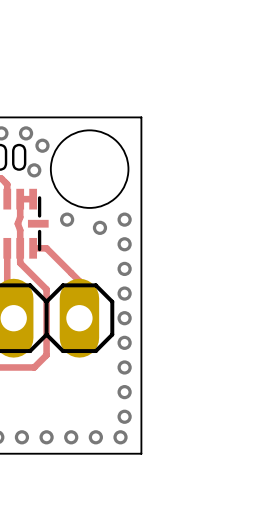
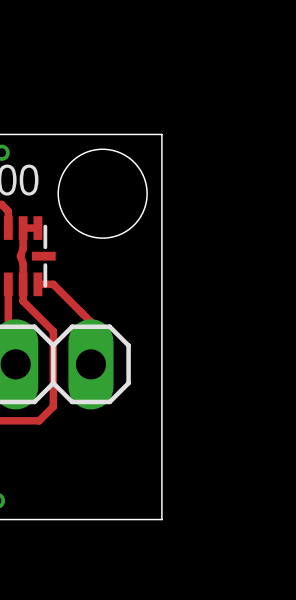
via: (26, 133) -> none
via: (42, 145) -> none
via: (34, 170) -> none
via: (67, 219) -> none
via: (124, 219) -> none
via: (99, 227) -> none
via: (124, 244) -> none
via: (124, 268) -> none
via: (124, 293) -> none
via: (124, 318) -> none
via: (124, 342) -> none
via: (124, 367) -> none
via: (124, 392) -> none
via: (124, 416) -> none
via: (21, 437) -> none
via: (46, 437) -> none
via: (71, 437) -> none
via: (95, 437) -> none
via: (120, 437) -> none

